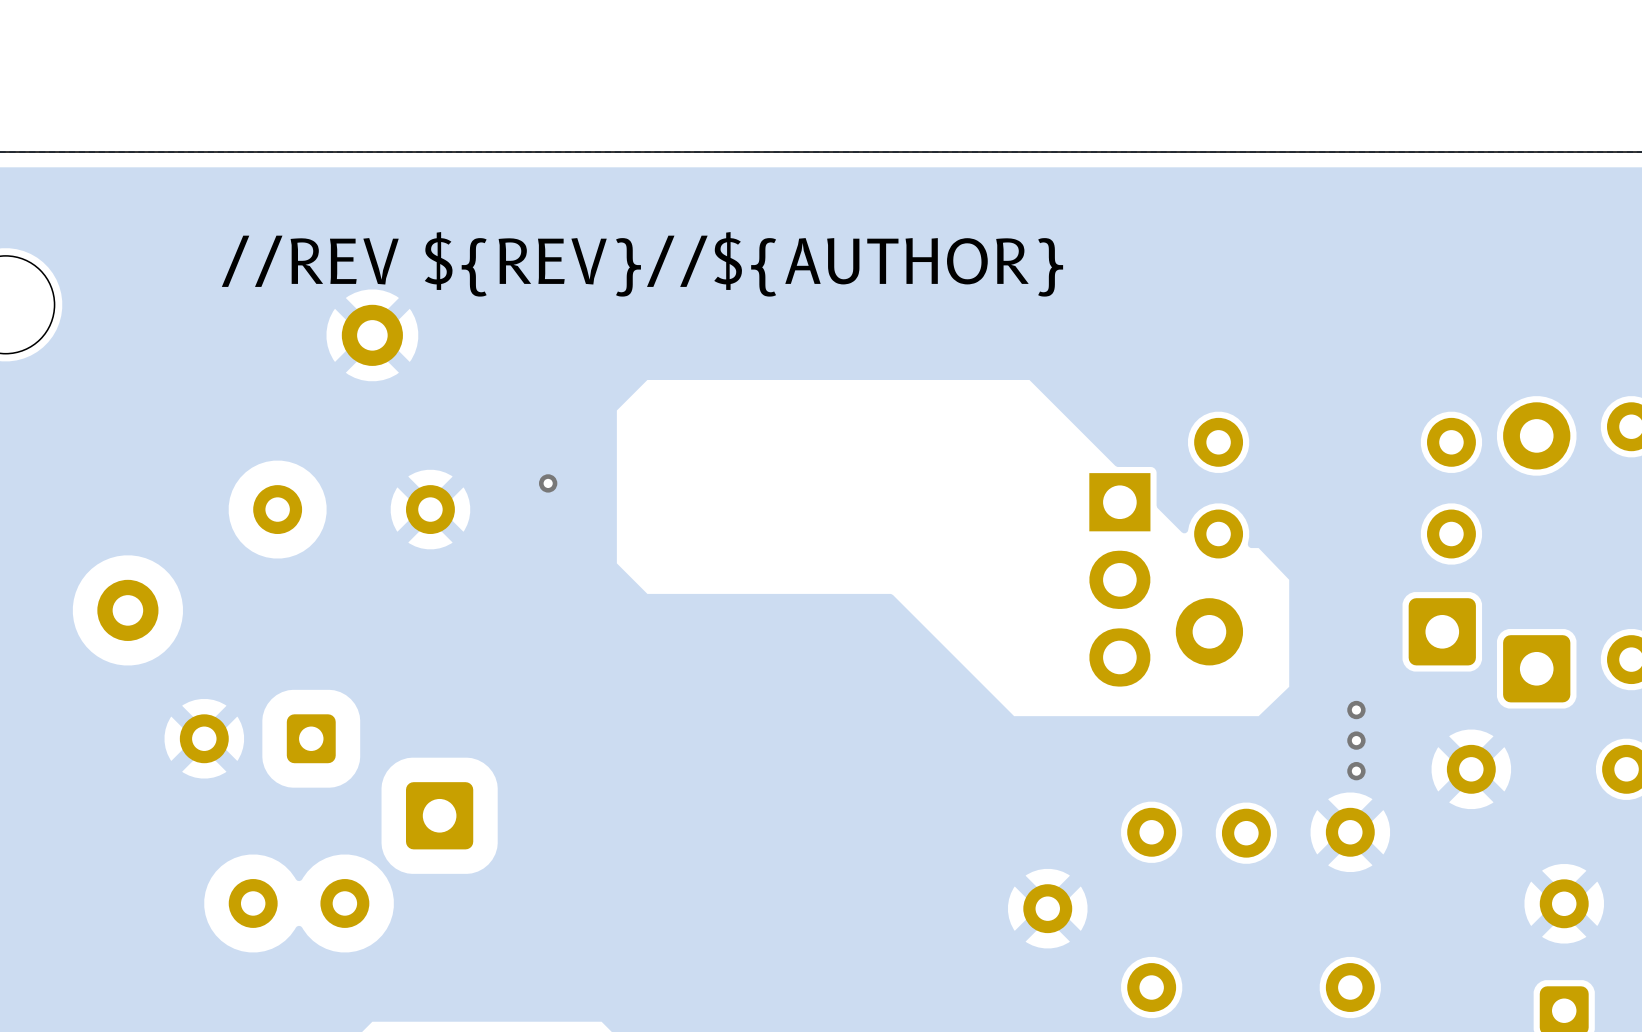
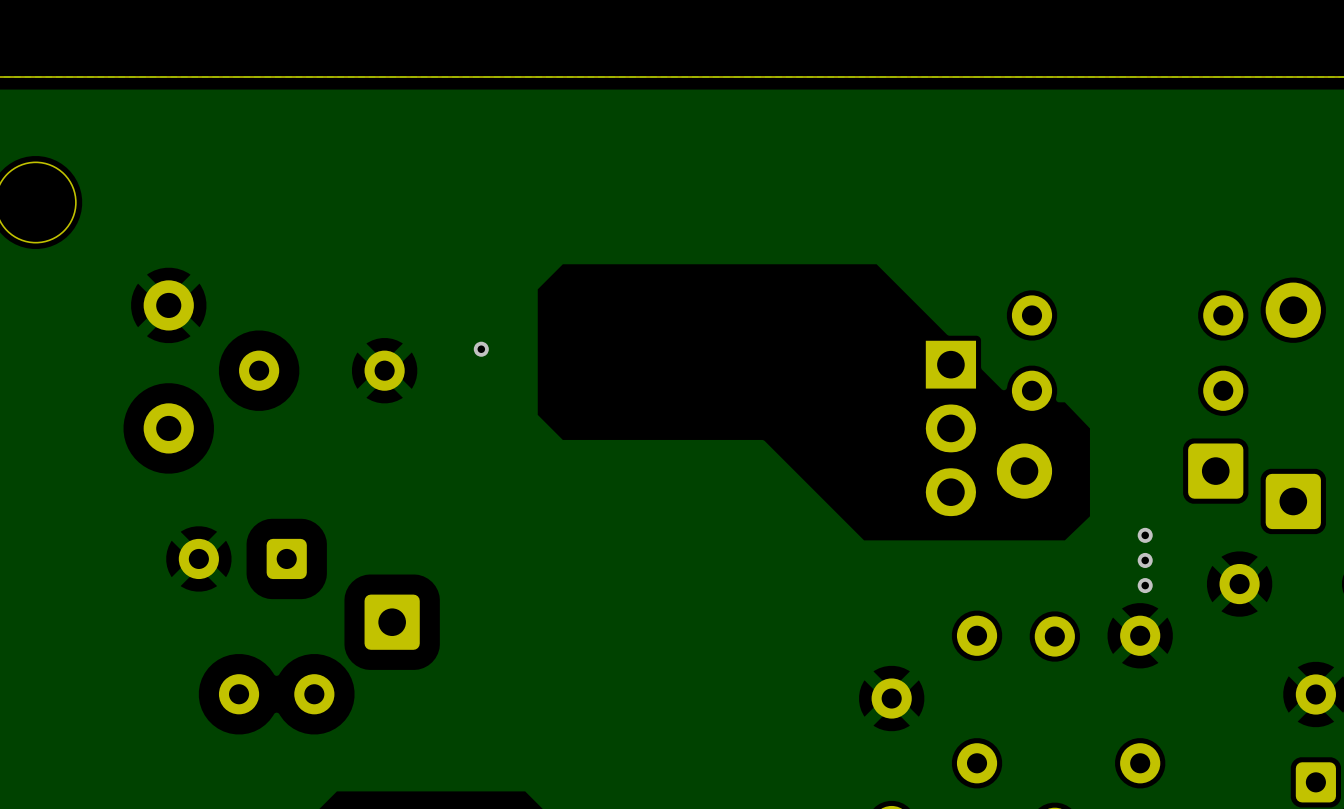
text: //REV ${REV}//${AUTHOR} (642, 264) -> none
part: (372, 335) -> none
part: none -> (168, 305)
part position: (127, 610) -> (168, 428)

